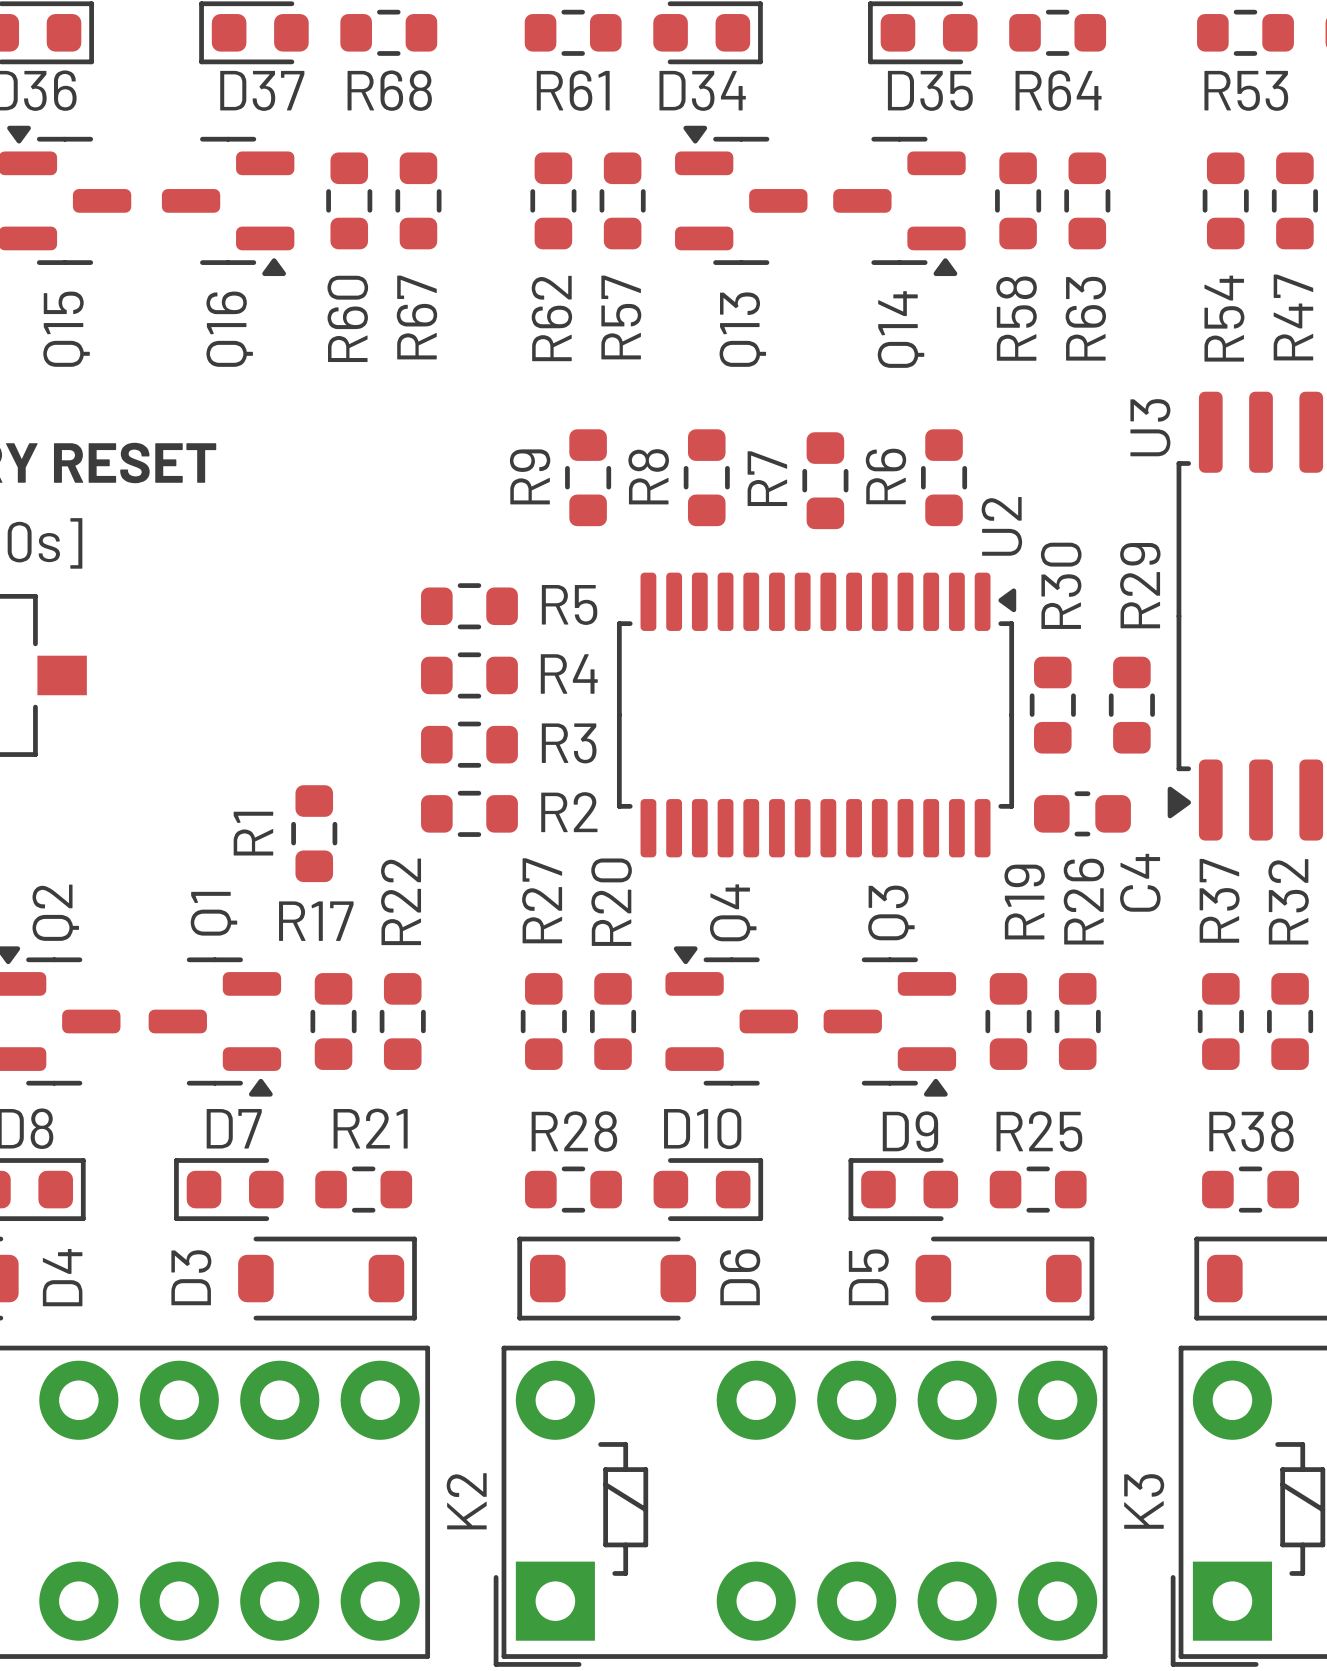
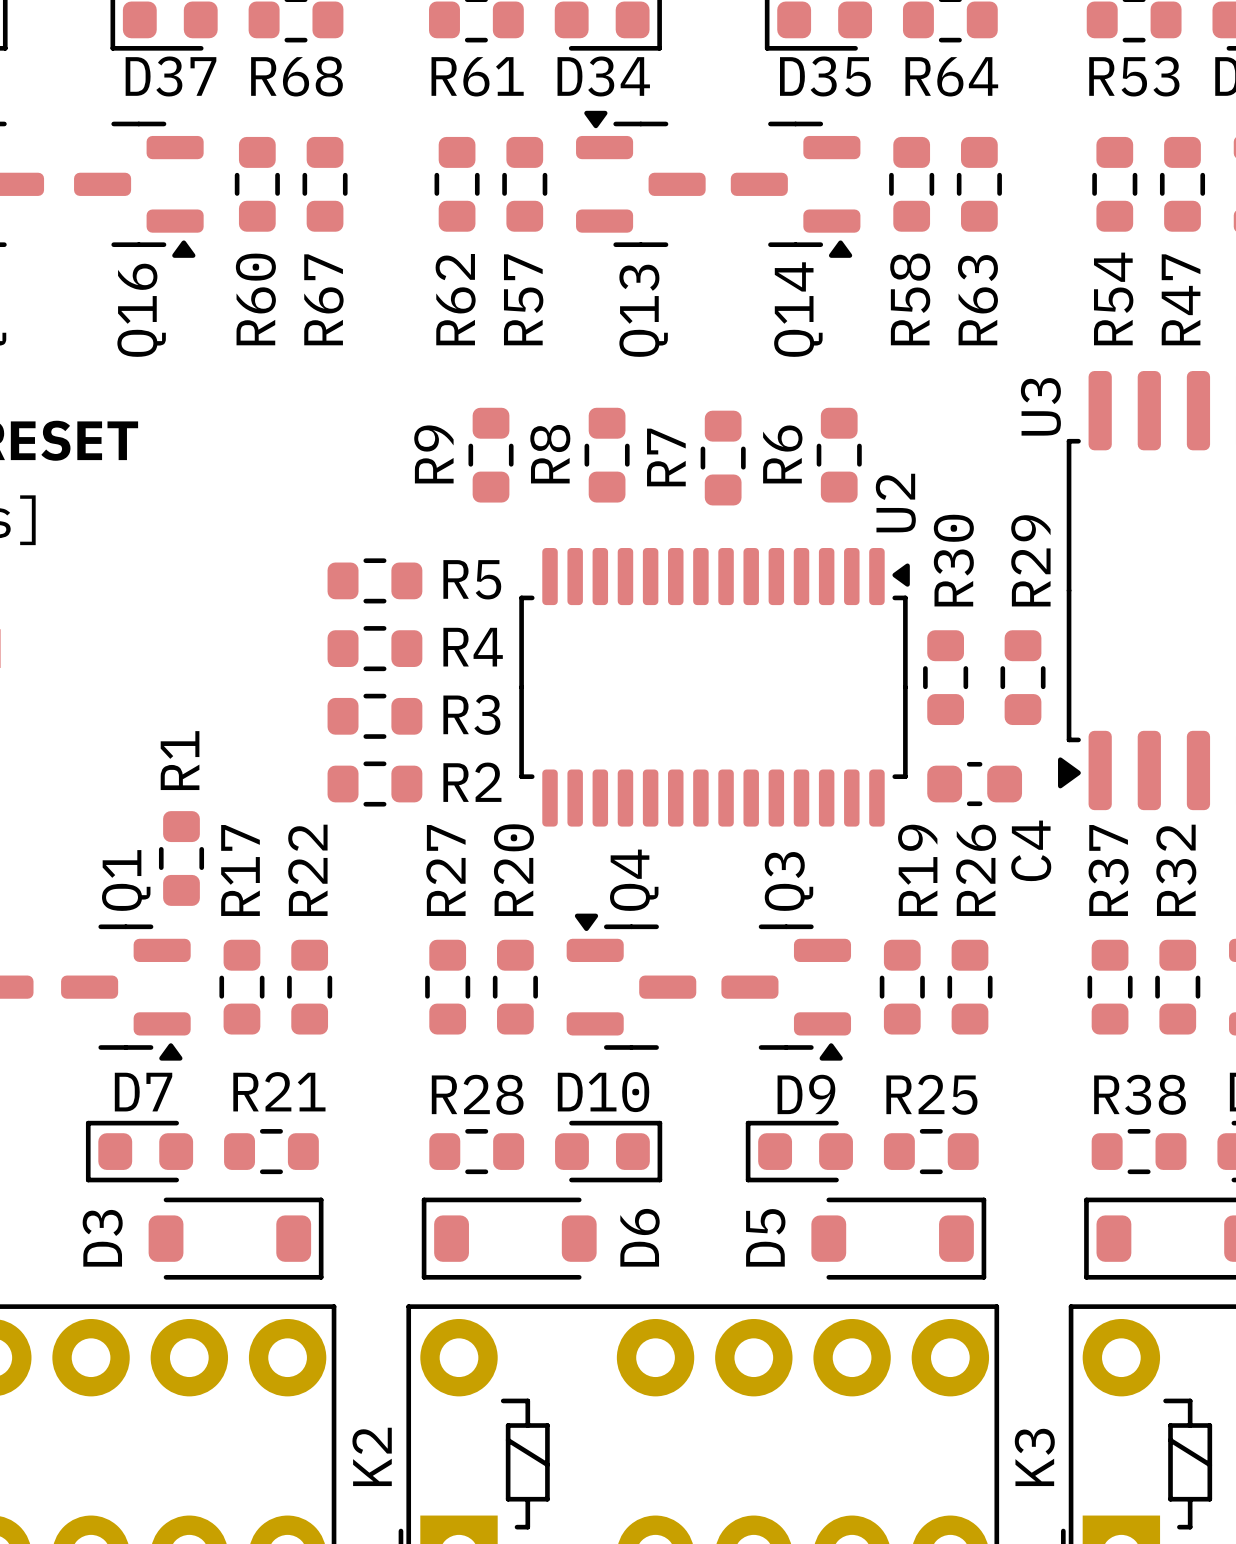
R1 name position: R1 (253, 833) -> R1 (180, 760)
R1 position: (314, 833) -> (181, 858)
R17 name rotation: 0° (316, 921) -> 90° counterclockwise (240, 870)

